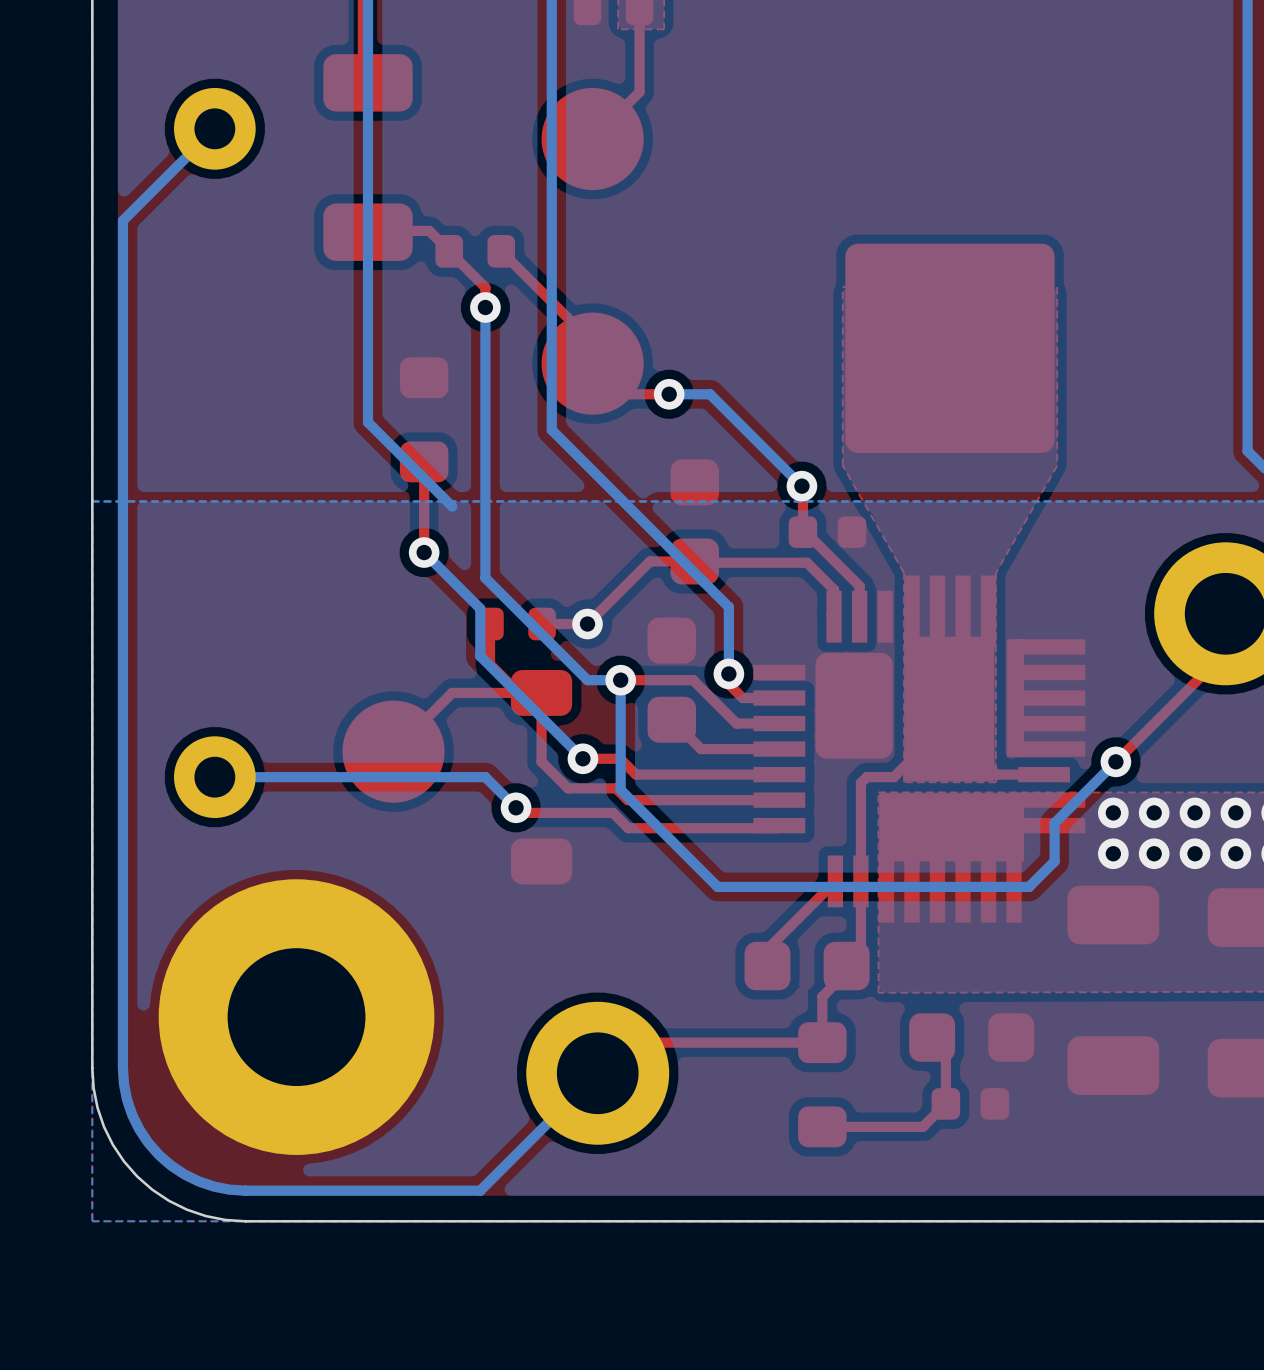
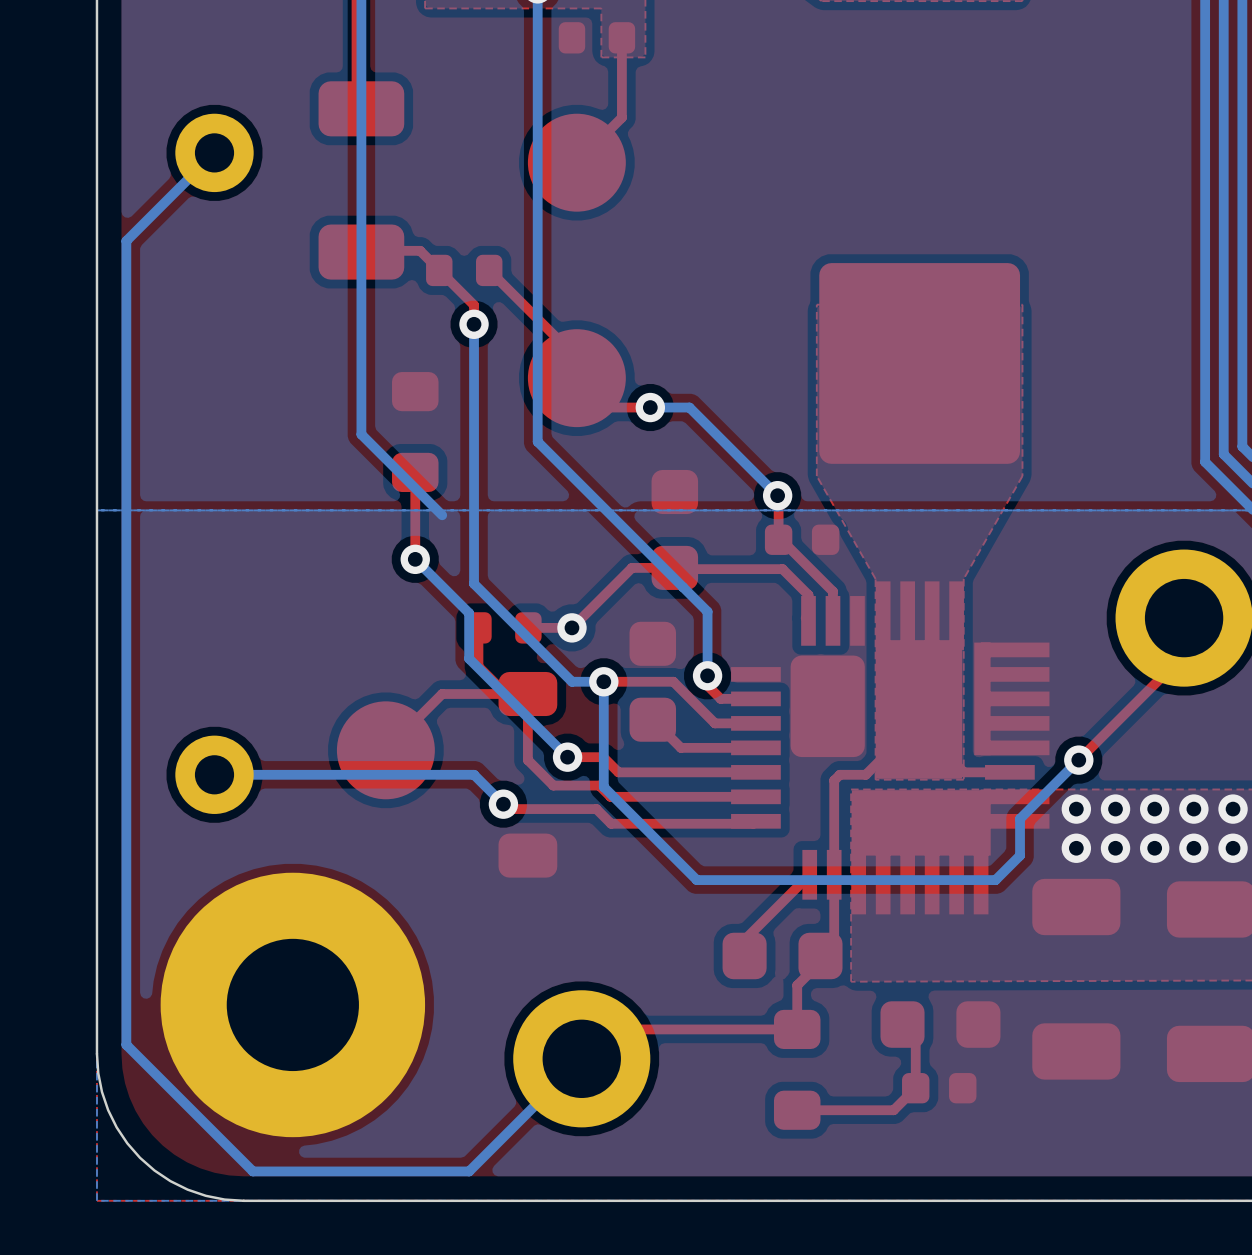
bottom track: (122, 1058) (124, 1084) (132, 1115) (139, 1129) (158, 1154) (184, 1174) (198, 1181) (229, 1189) (254, 1190) -> (126, 1044) (252, 1171)

